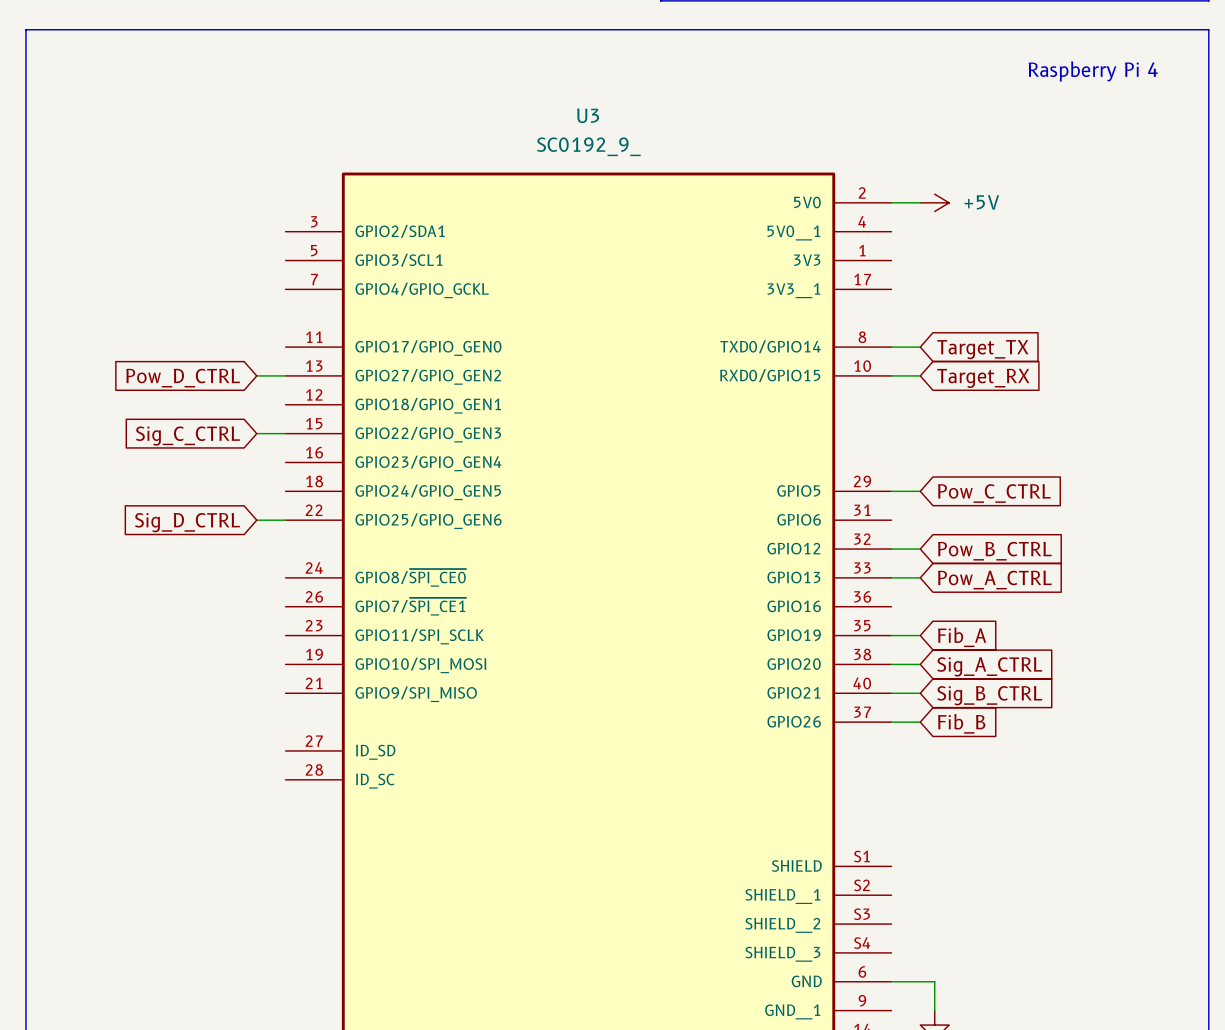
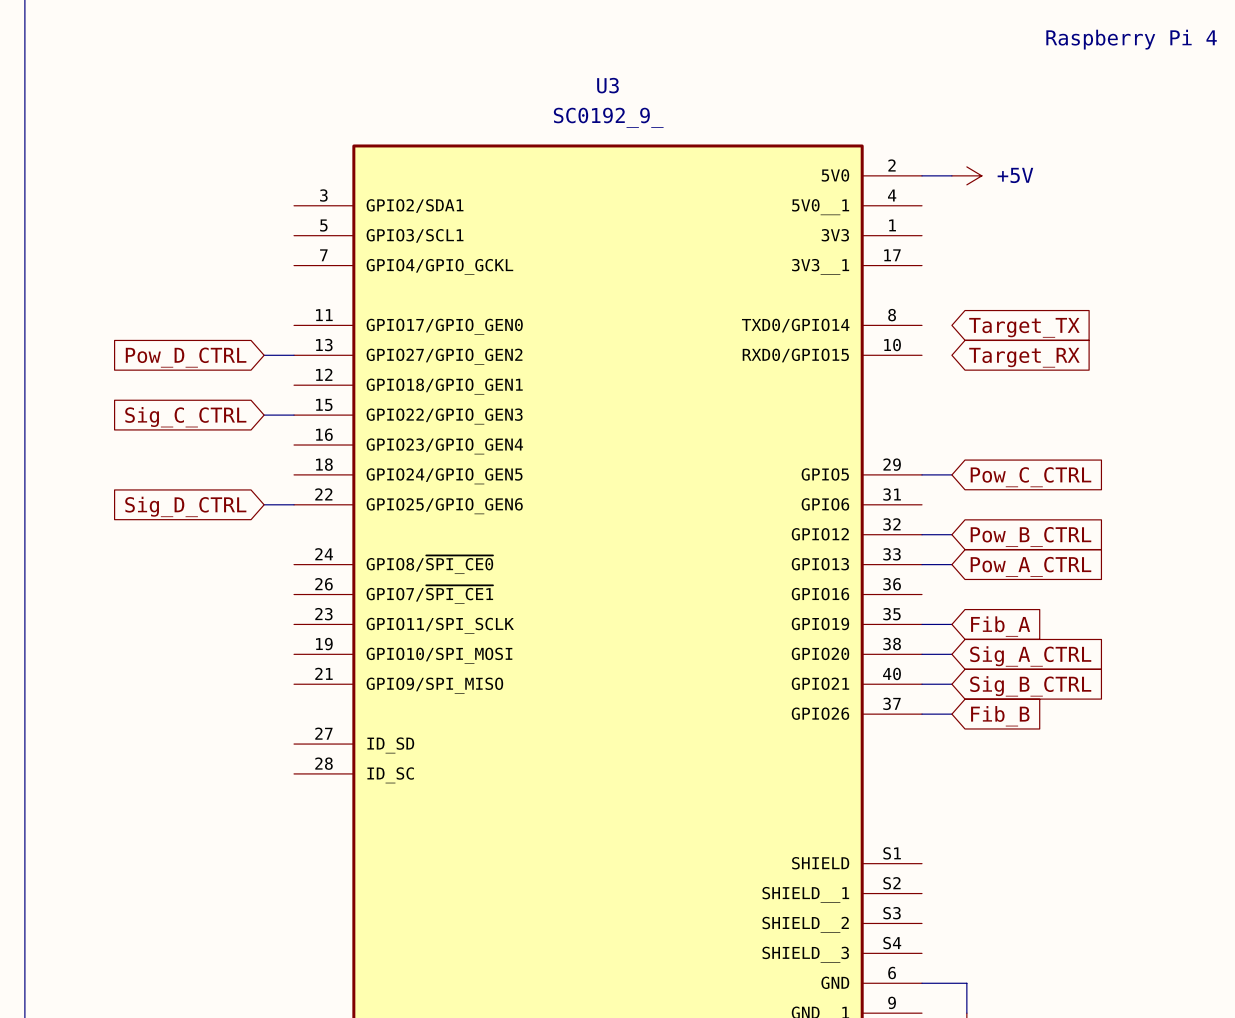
wire: (891, 347) (920, 347) -> none
wire: (891, 375) (920, 375) -> none

